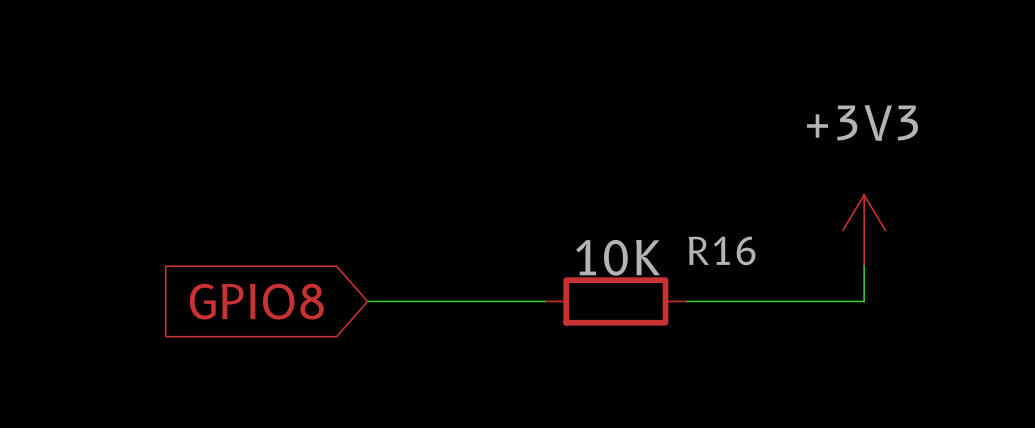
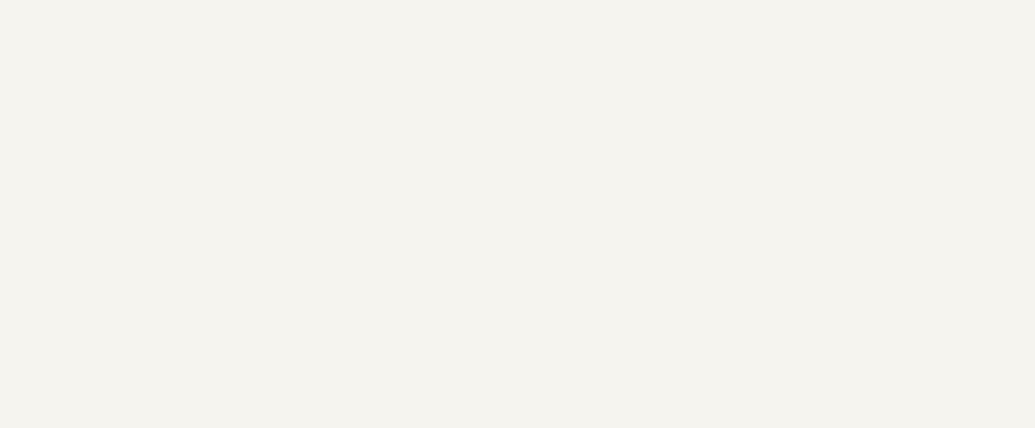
power symbol: +3V3 (864, 230) -> none
wire: (864, 265) (864, 301) (686, 301) -> none
global label: GPIO8 (256, 301) -> none
wire: (367, 301) (544, 301) -> none
R16: 10K (615, 301) -> none

